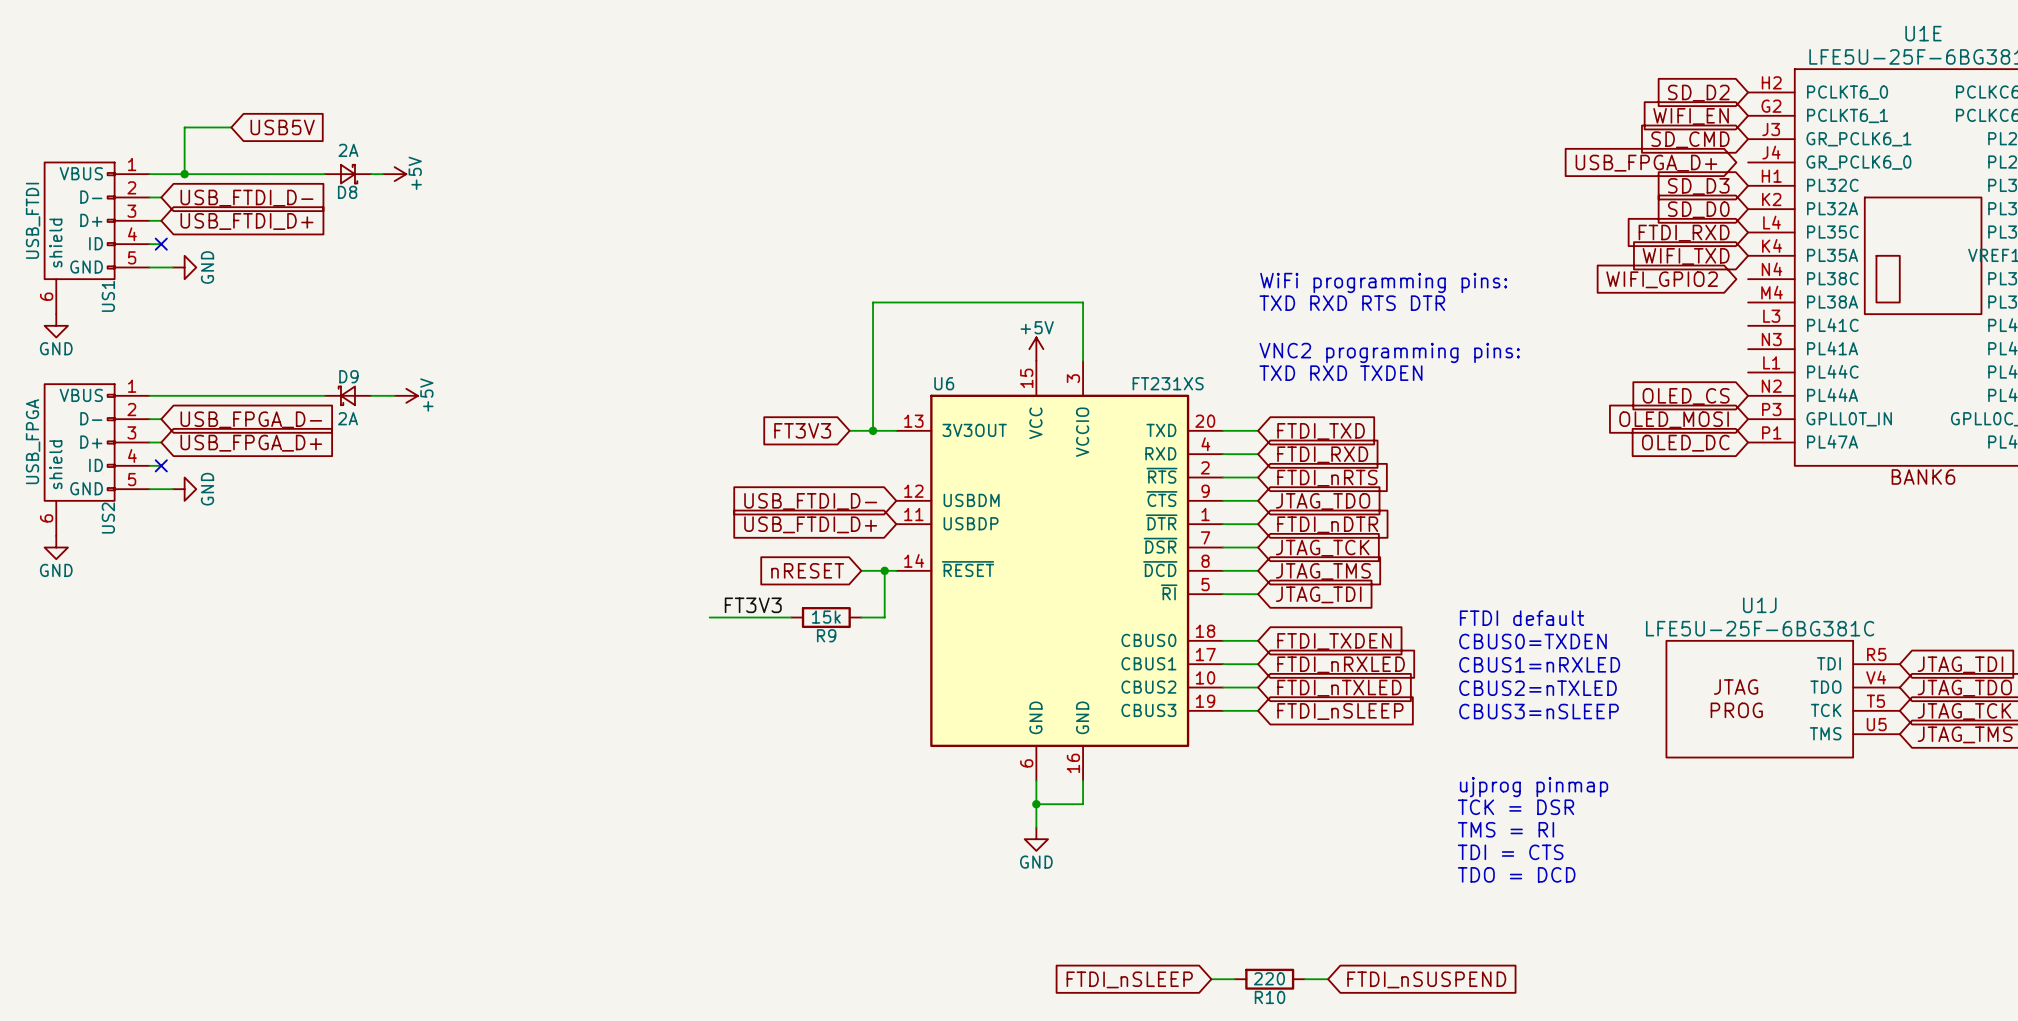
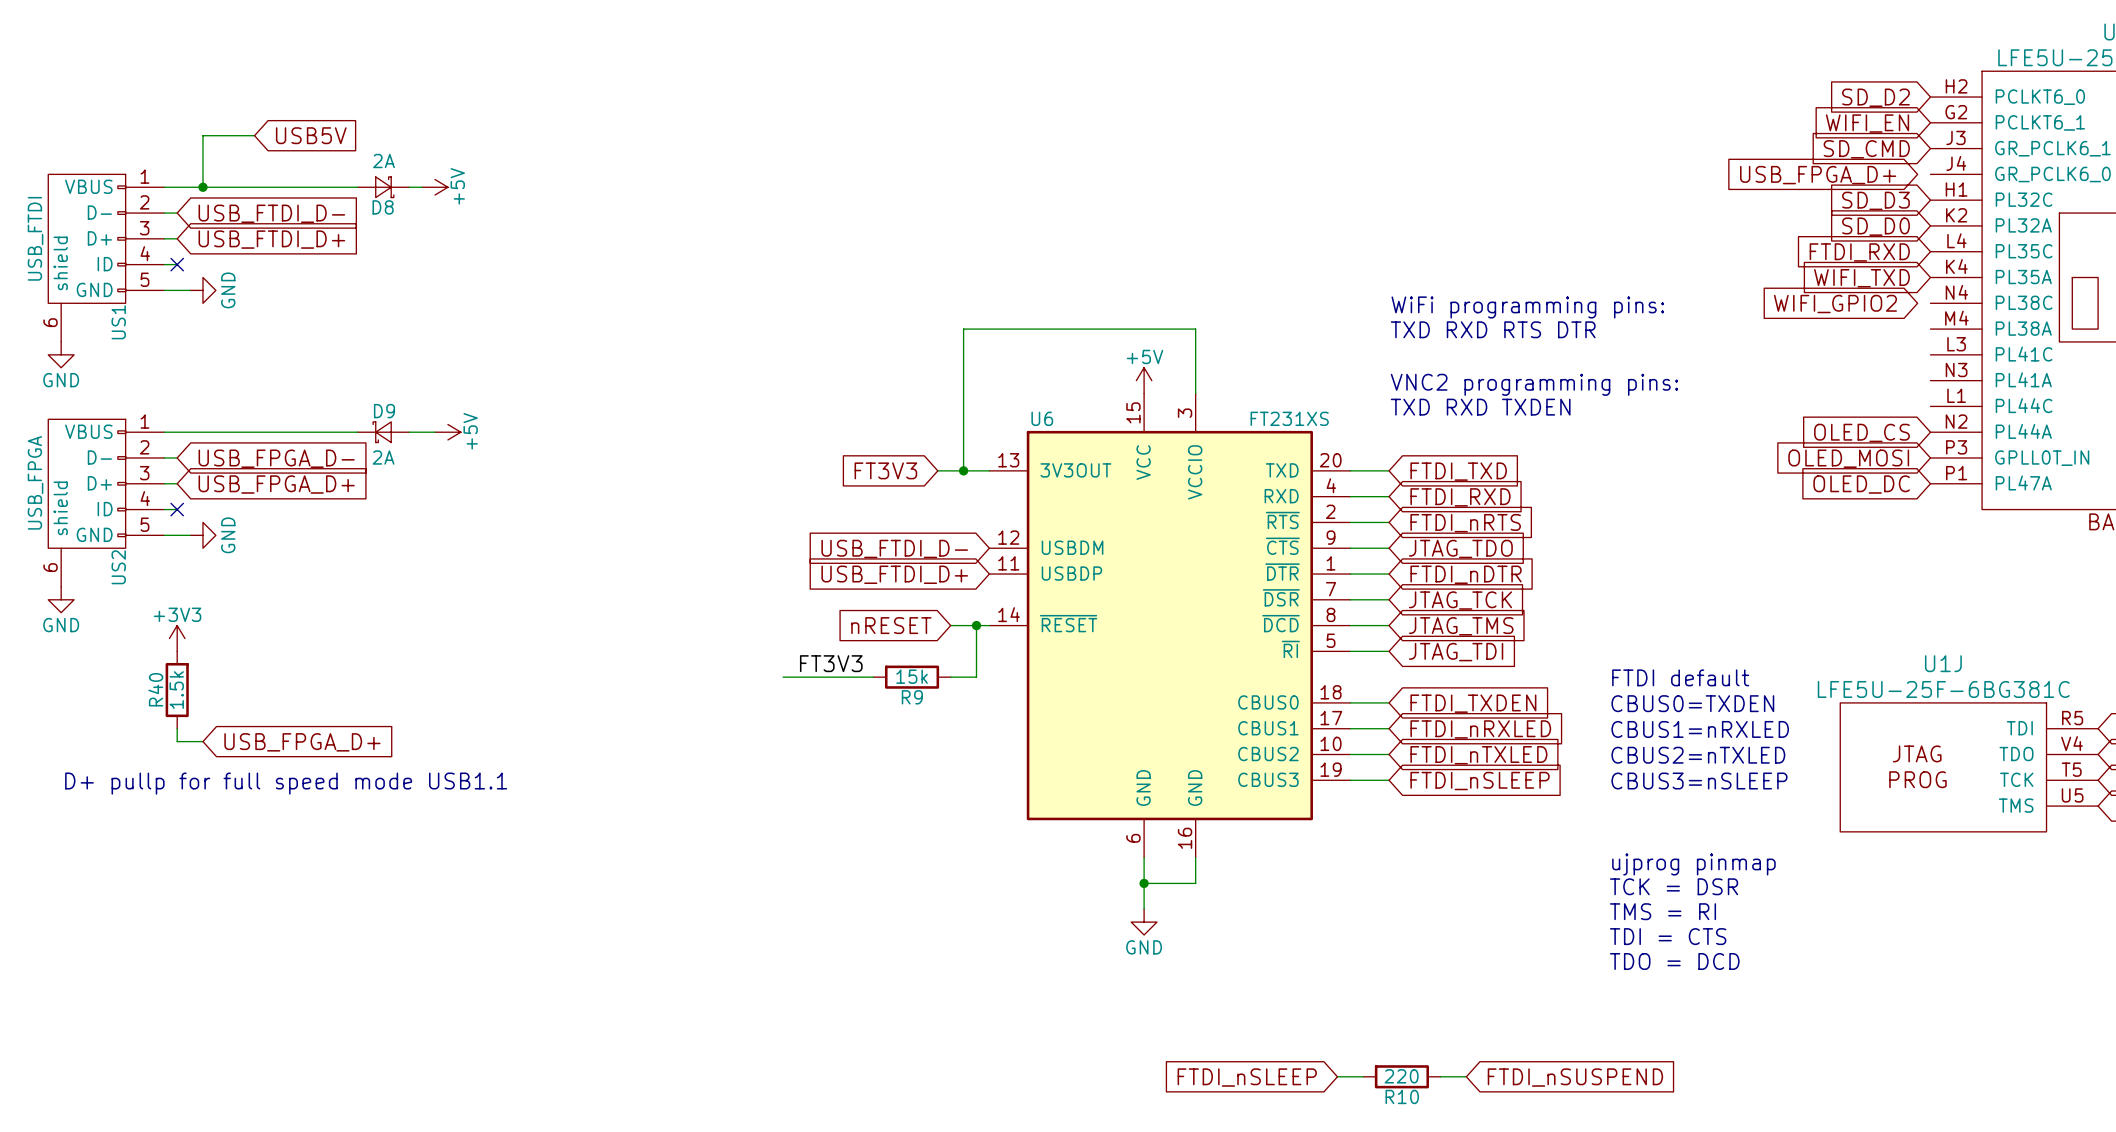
power symbol: none -> +3V3 (177, 638)
R40: none -> 1.5k (177, 690)
wire: none -> (177, 728) (177, 741) (202, 741)
global label: none -> USB_FPGA_D+ (302, 742)
text: none -> D+ pullp for full speed mode USB1.1 (286, 783)

